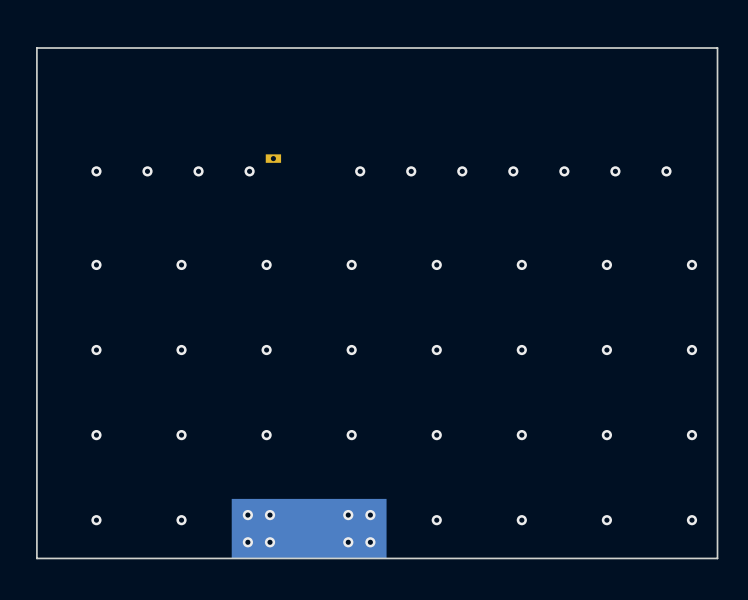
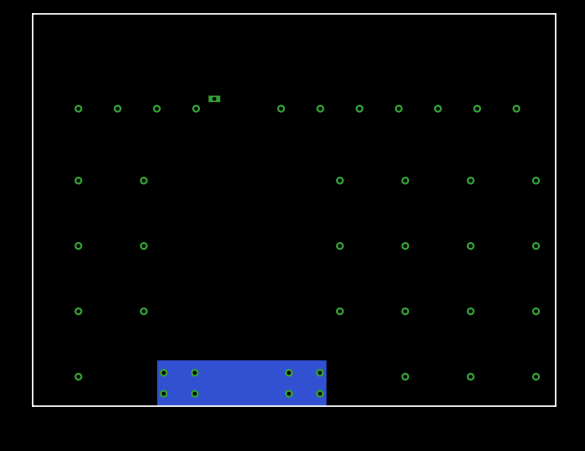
via: (266, 264) -> none
via: (351, 264) -> none
via: (266, 350) -> none
via: (351, 350) -> none
via: (266, 435) -> none
via: (351, 435) -> none
part footprint: [231, 498, 387, 559] -> [157, 360, 327, 407]
via: none -> (163, 372)
via: (270, 515) -> none
via: (348, 515) -> none
via: none -> (319, 372)
via: (181, 520) -> none
via: (436, 520) -> none
via: none -> (163, 393)
via: (270, 542) -> none
via: (348, 542) -> none
via: none -> (319, 393)

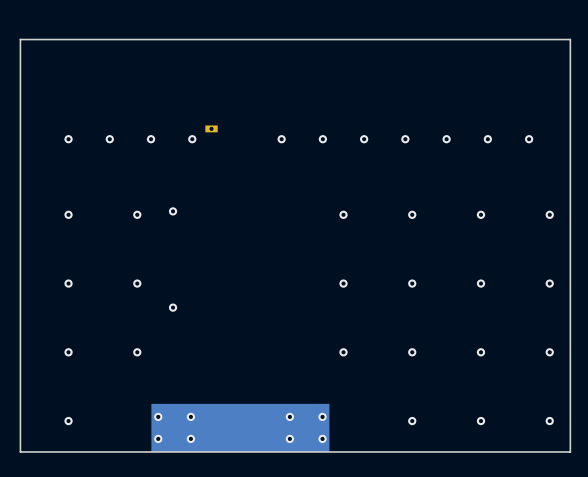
via: none -> (173, 211)
via: none -> (173, 307)

